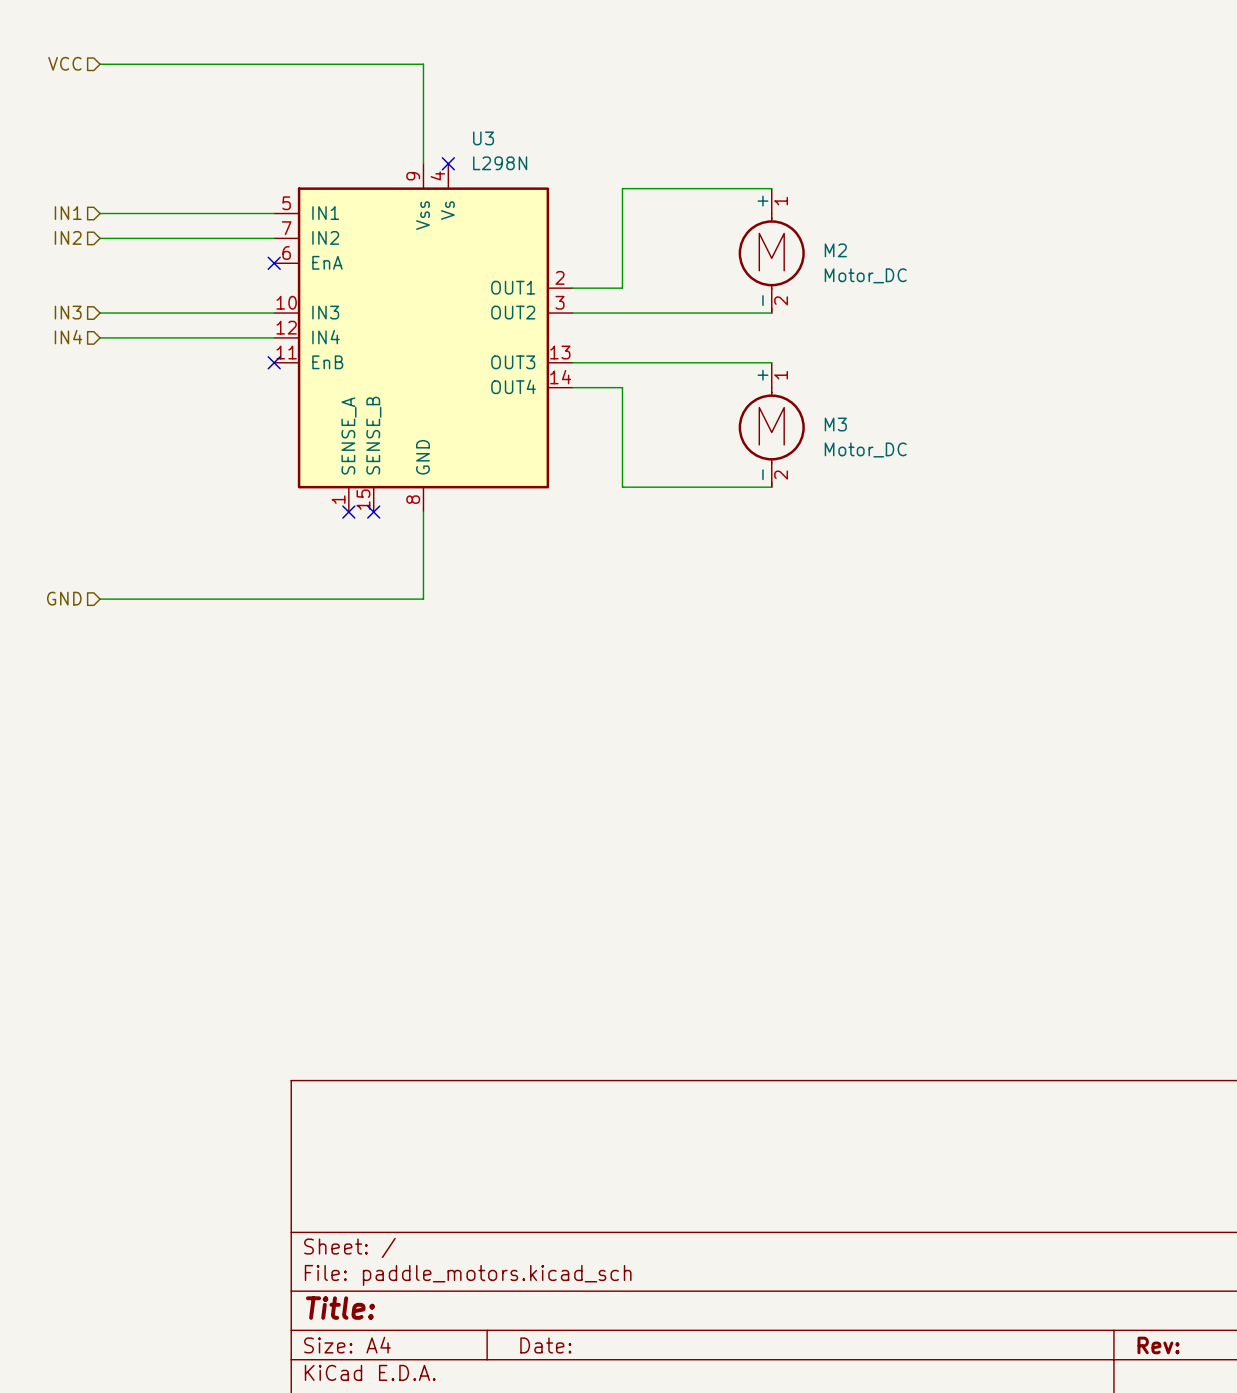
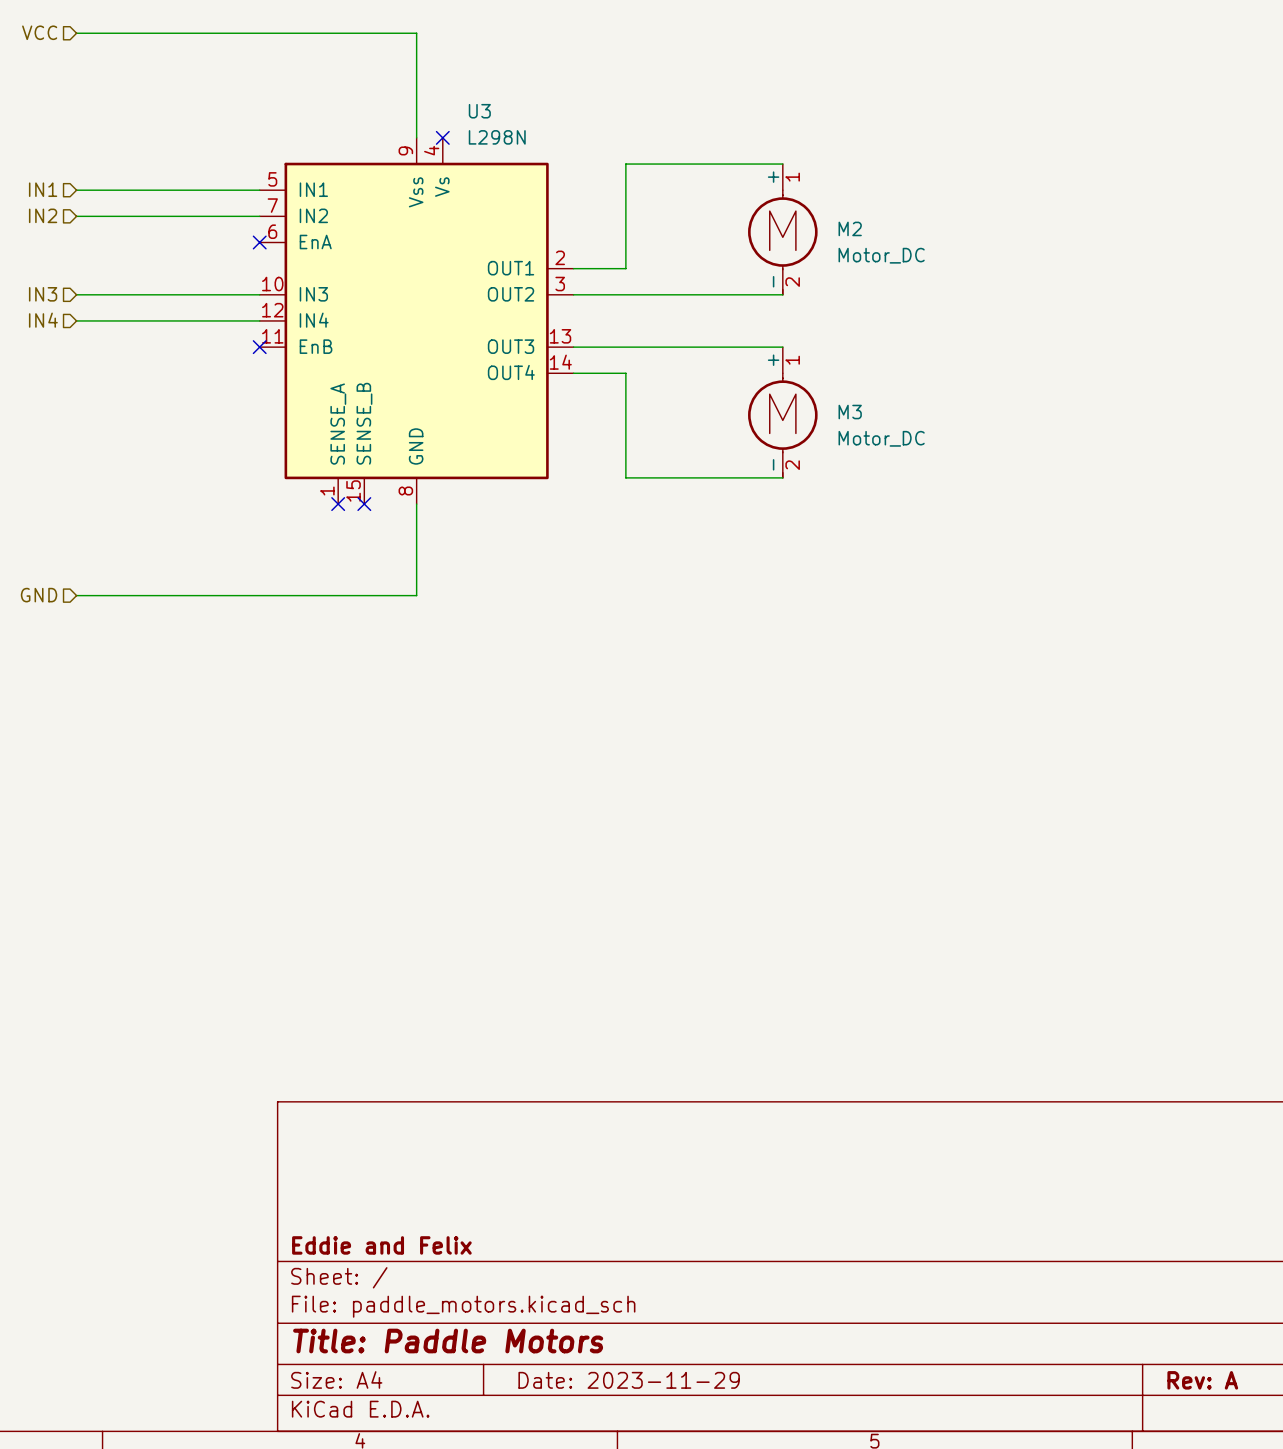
title block: none -> Eddie and Felix (381, 1245)
title block: Title: (340, 1308) -> Title: Paddle Motors (448, 1341)
title block: Date: (545, 1345) -> Date: 2023-11-29 (629, 1380)
title block: Rev: (1158, 1345) -> Rev: A (1202, 1380)

